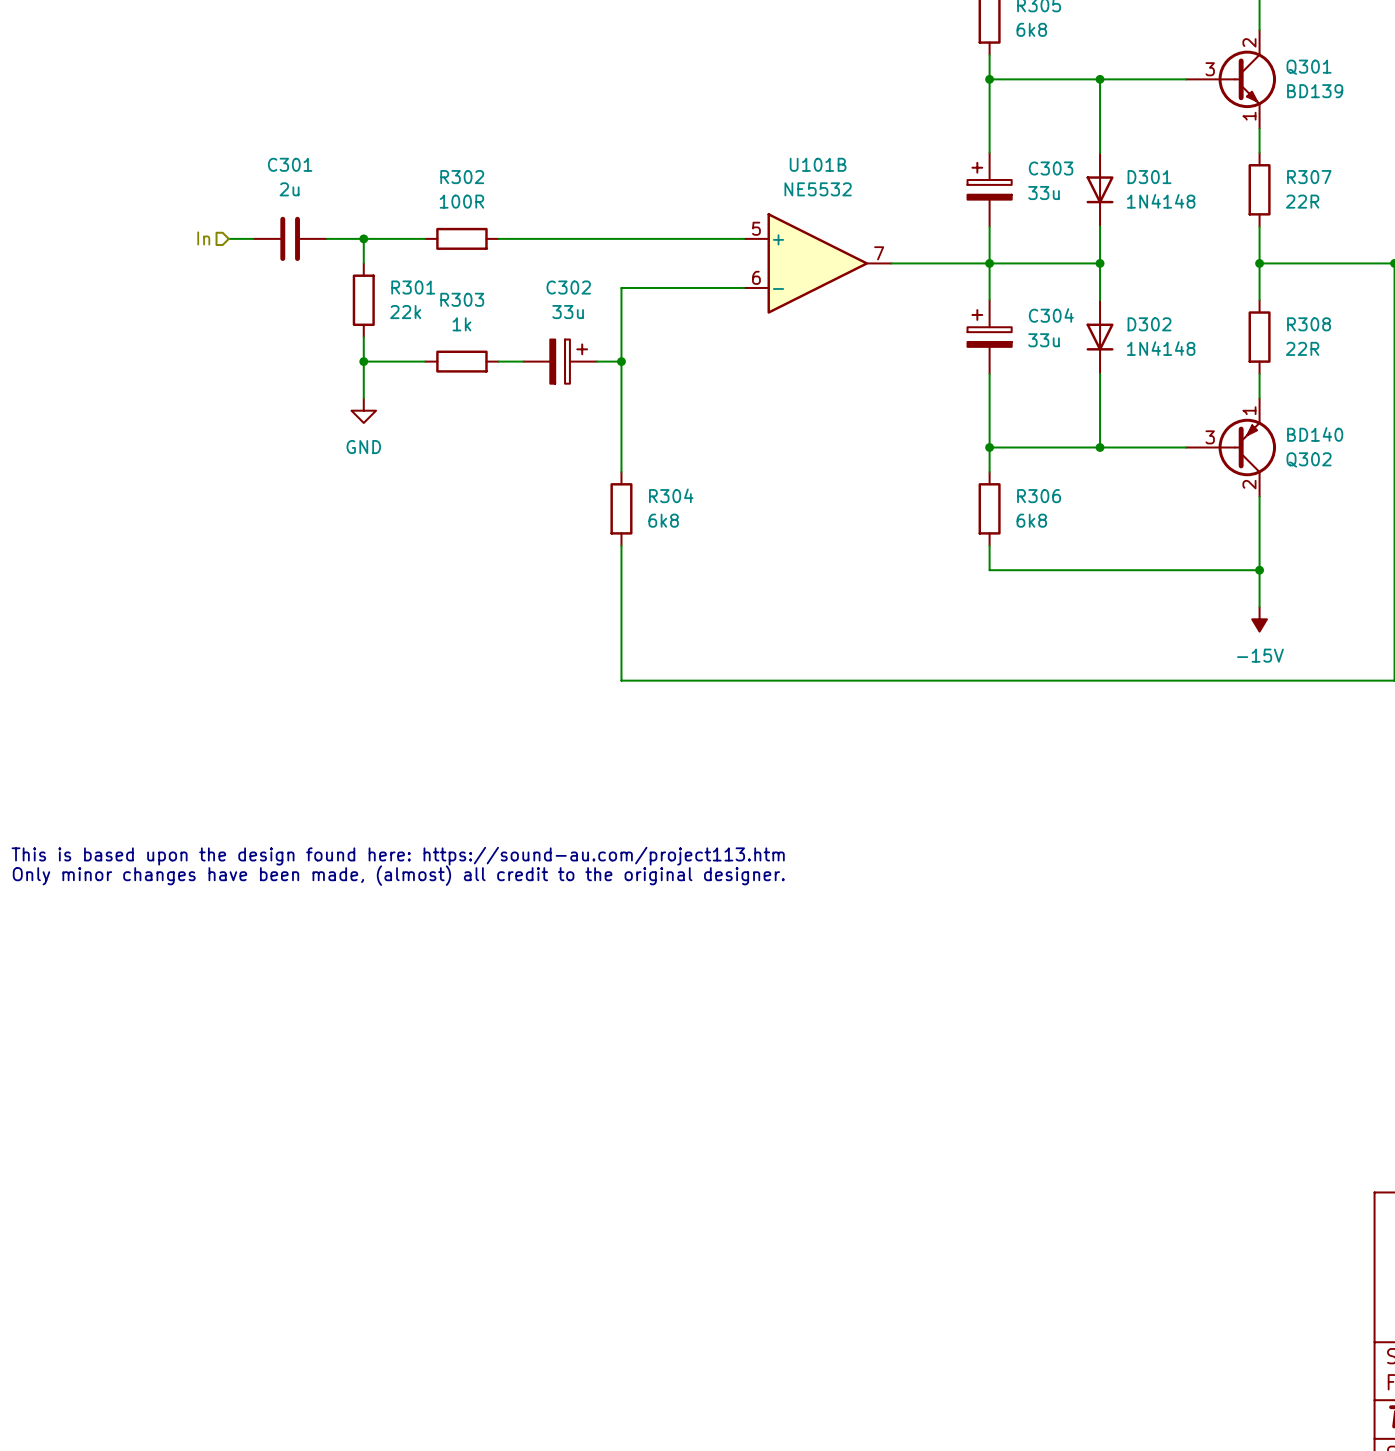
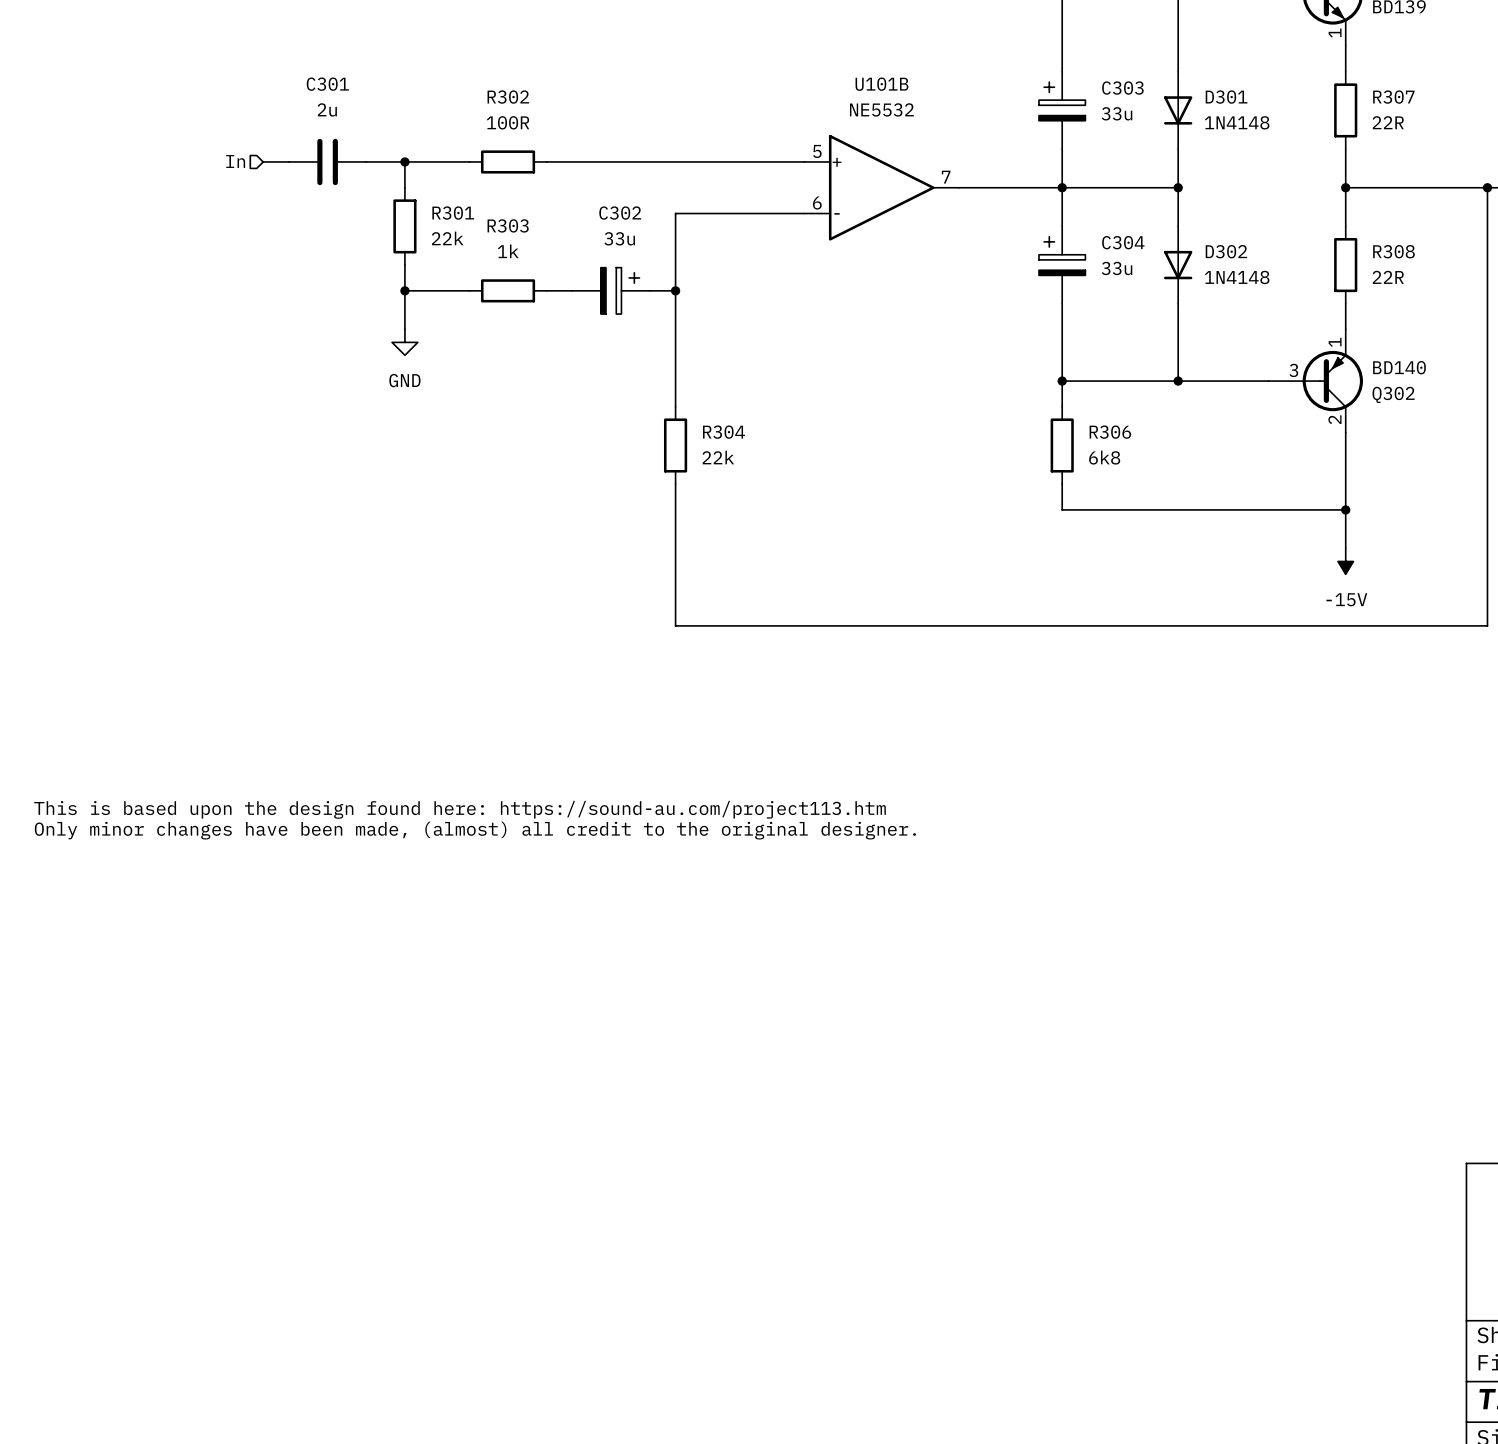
R304 value: 6k8 (663, 520) -> 22k (718, 457)

